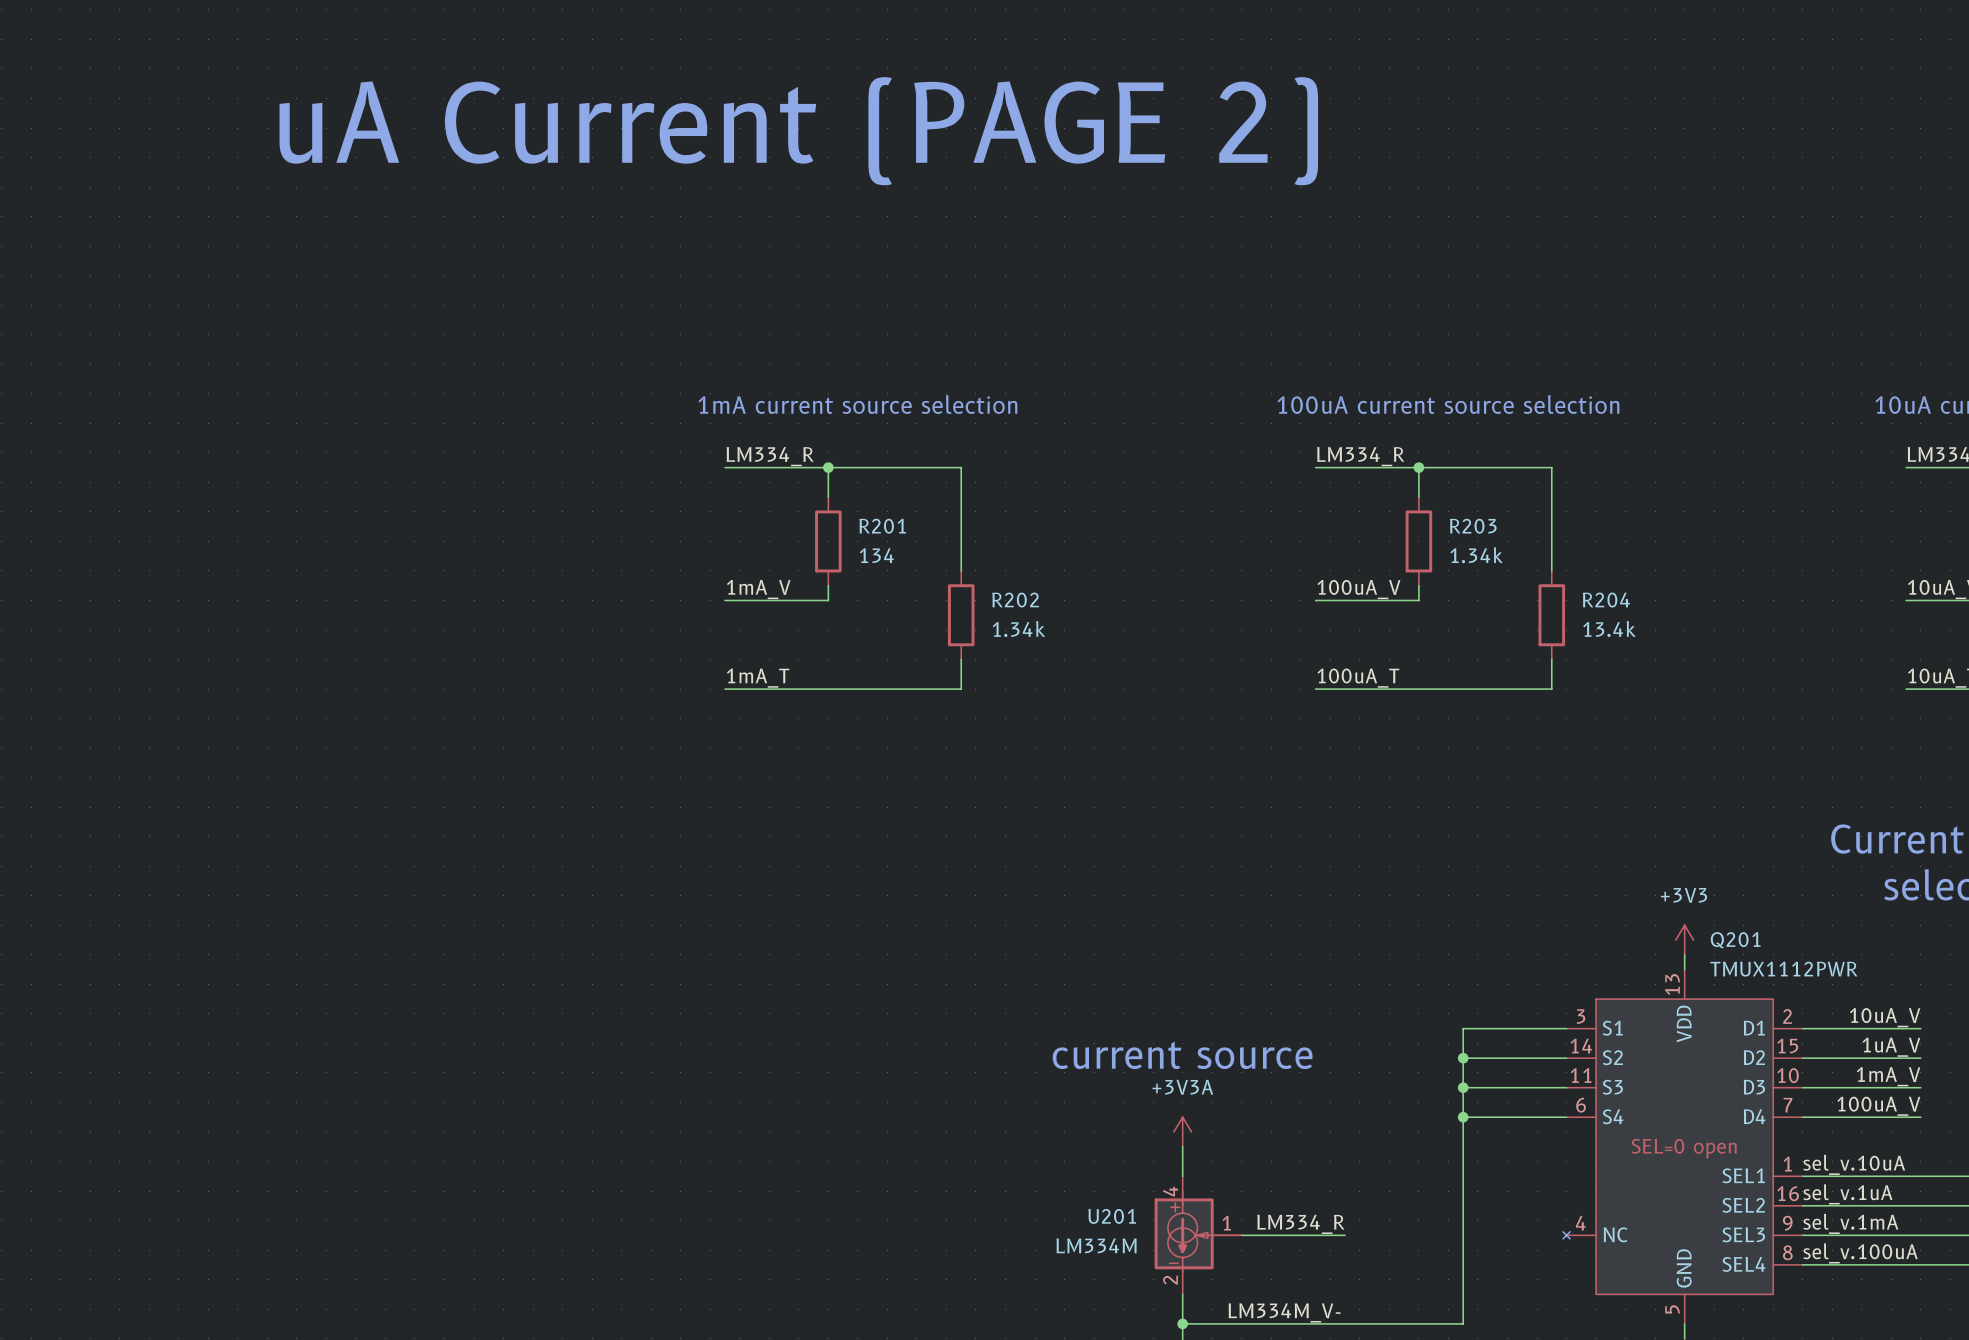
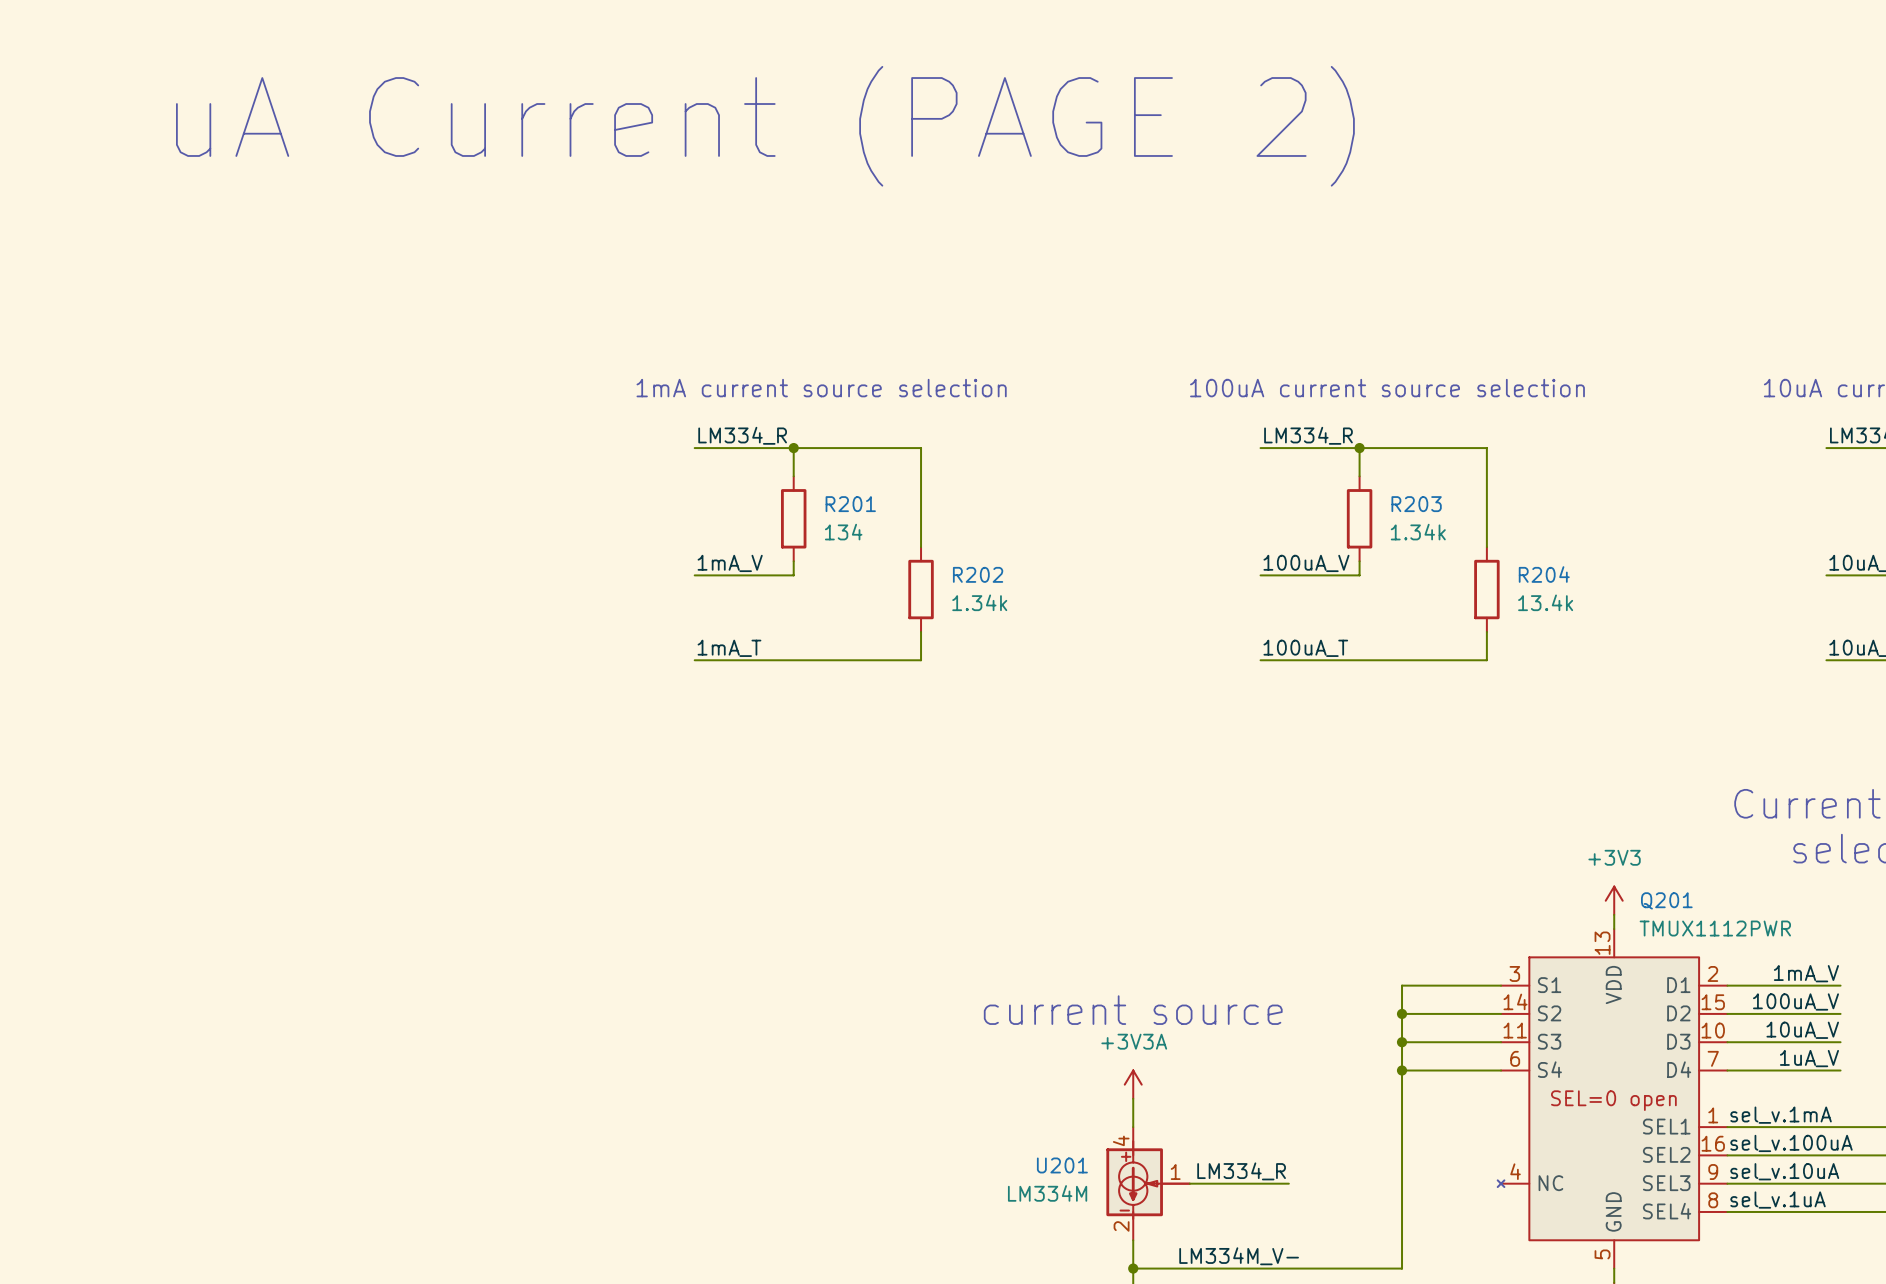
label: 10uA_V (1885, 1017) -> 1mA_V (1806, 973)
label: 1uA_V (1891, 1047) -> 100uA_V (1795, 1001)
label: 1mA_V (1888, 1076) -> 10uA_V (1802, 1030)
label: 100uA_V (1878, 1106) -> 1uA_V (1809, 1058)
label: sel_v.10uA (1854, 1164) -> sel_v.1mA (1781, 1115)
label: sel_v.1uA (1847, 1194) -> sel_v.100uA (1791, 1143)
label: sel_v.1mA (1850, 1223) -> sel_v.10uA (1784, 1171)
label: sel_v.100uA (1860, 1253) -> sel_v.1uA (1778, 1200)

